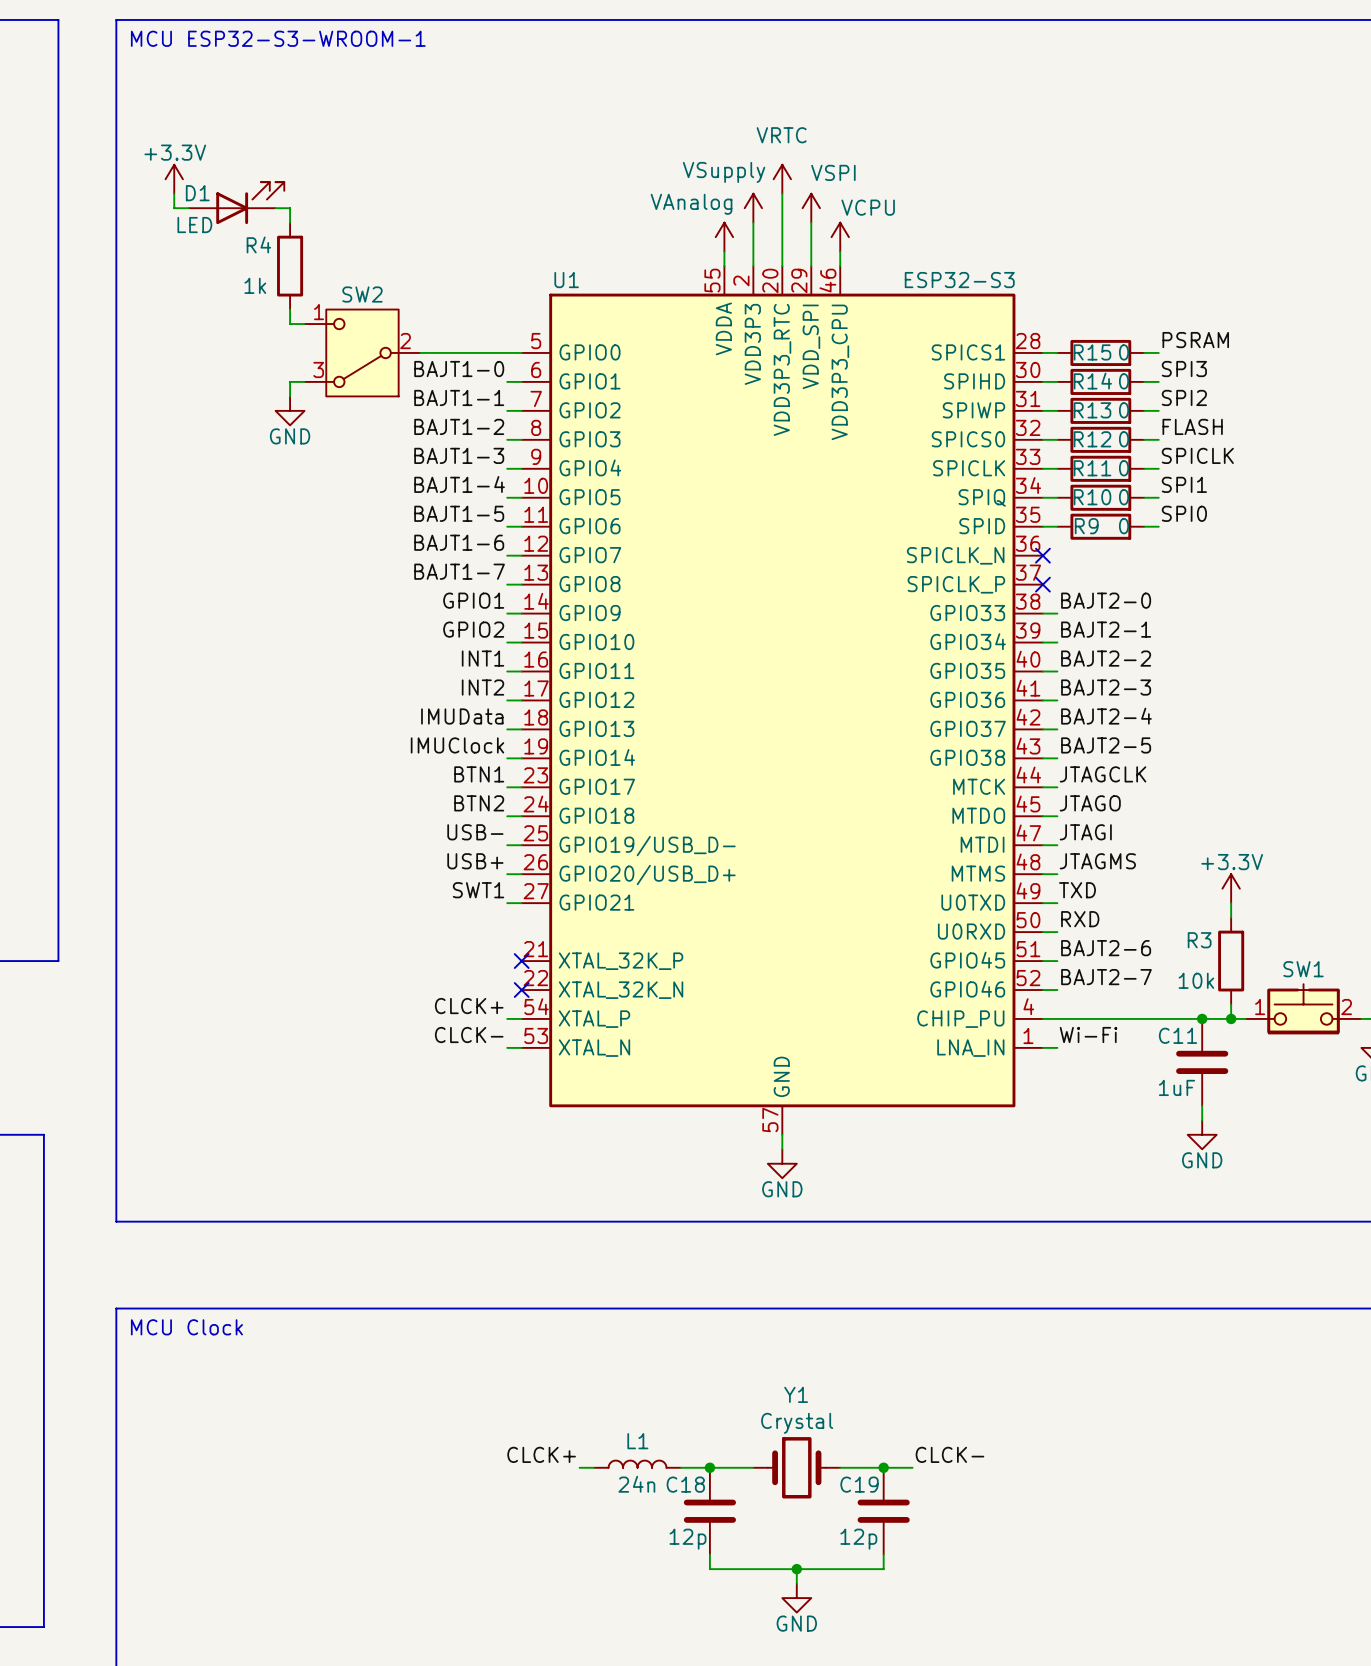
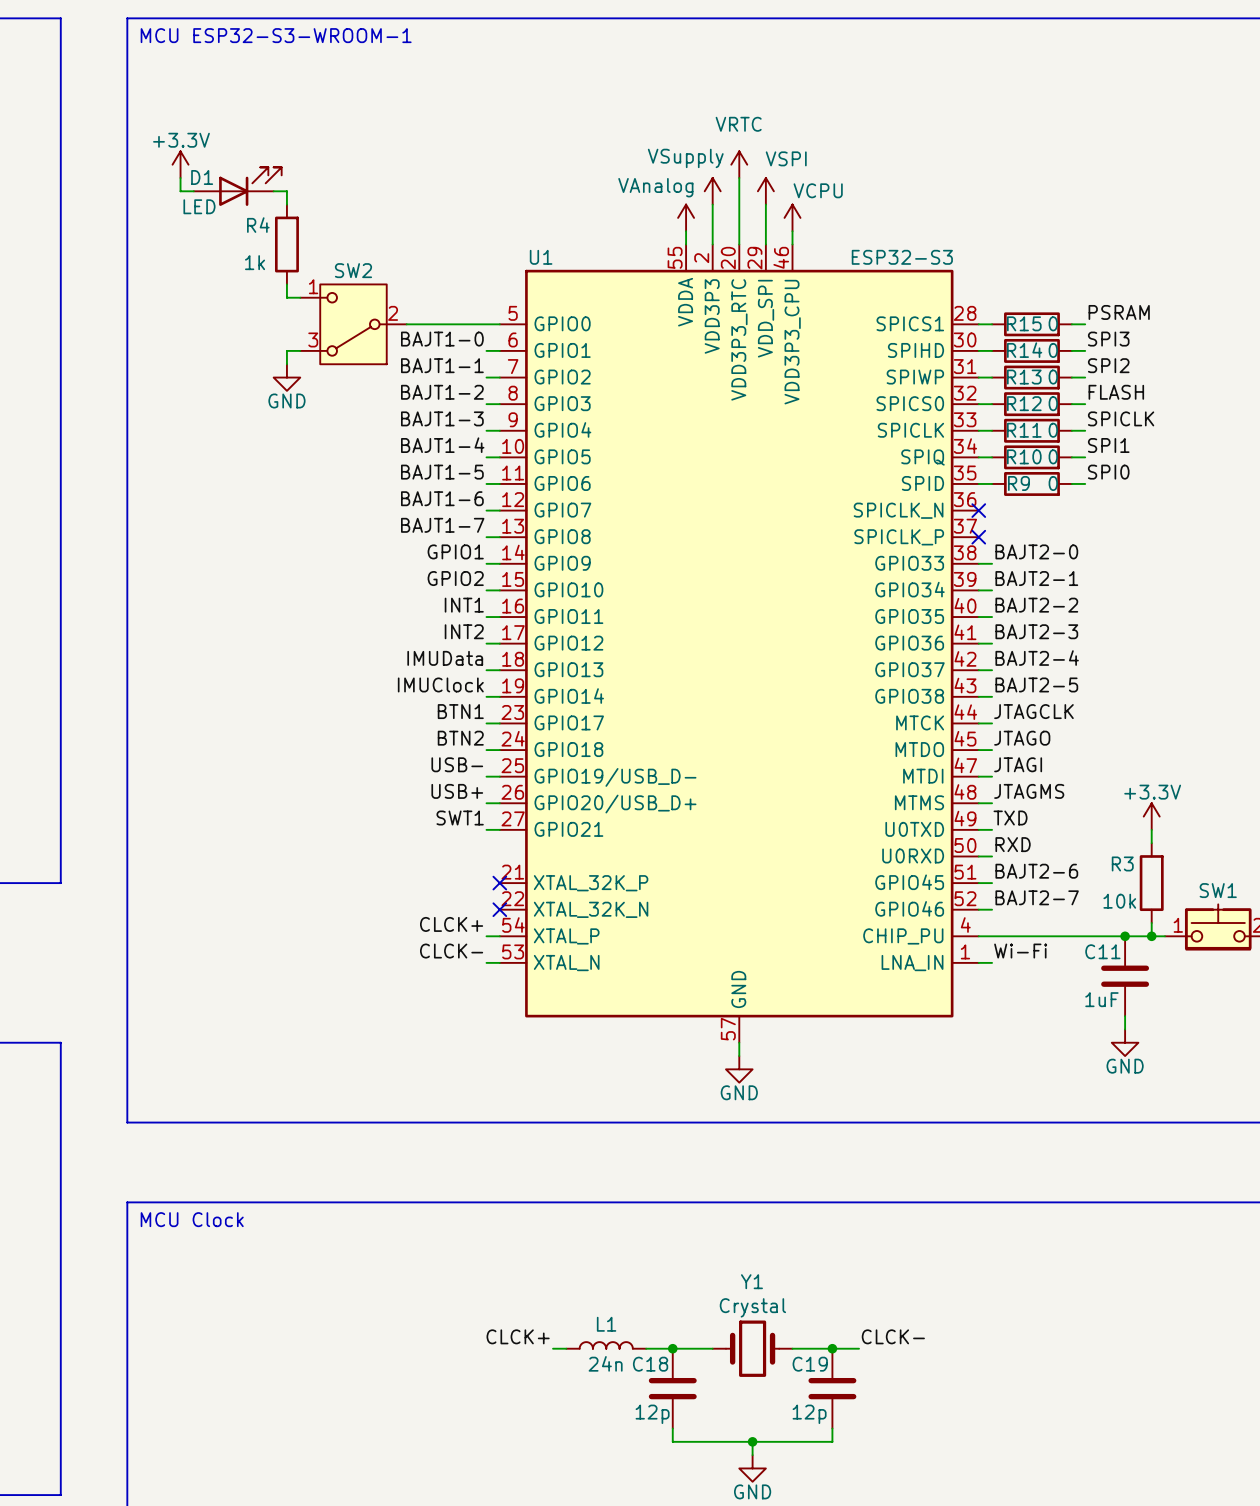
line: (43, 19) (58, 19) (58, 961) (43, 961) -> (60, 18) (60, 883)

